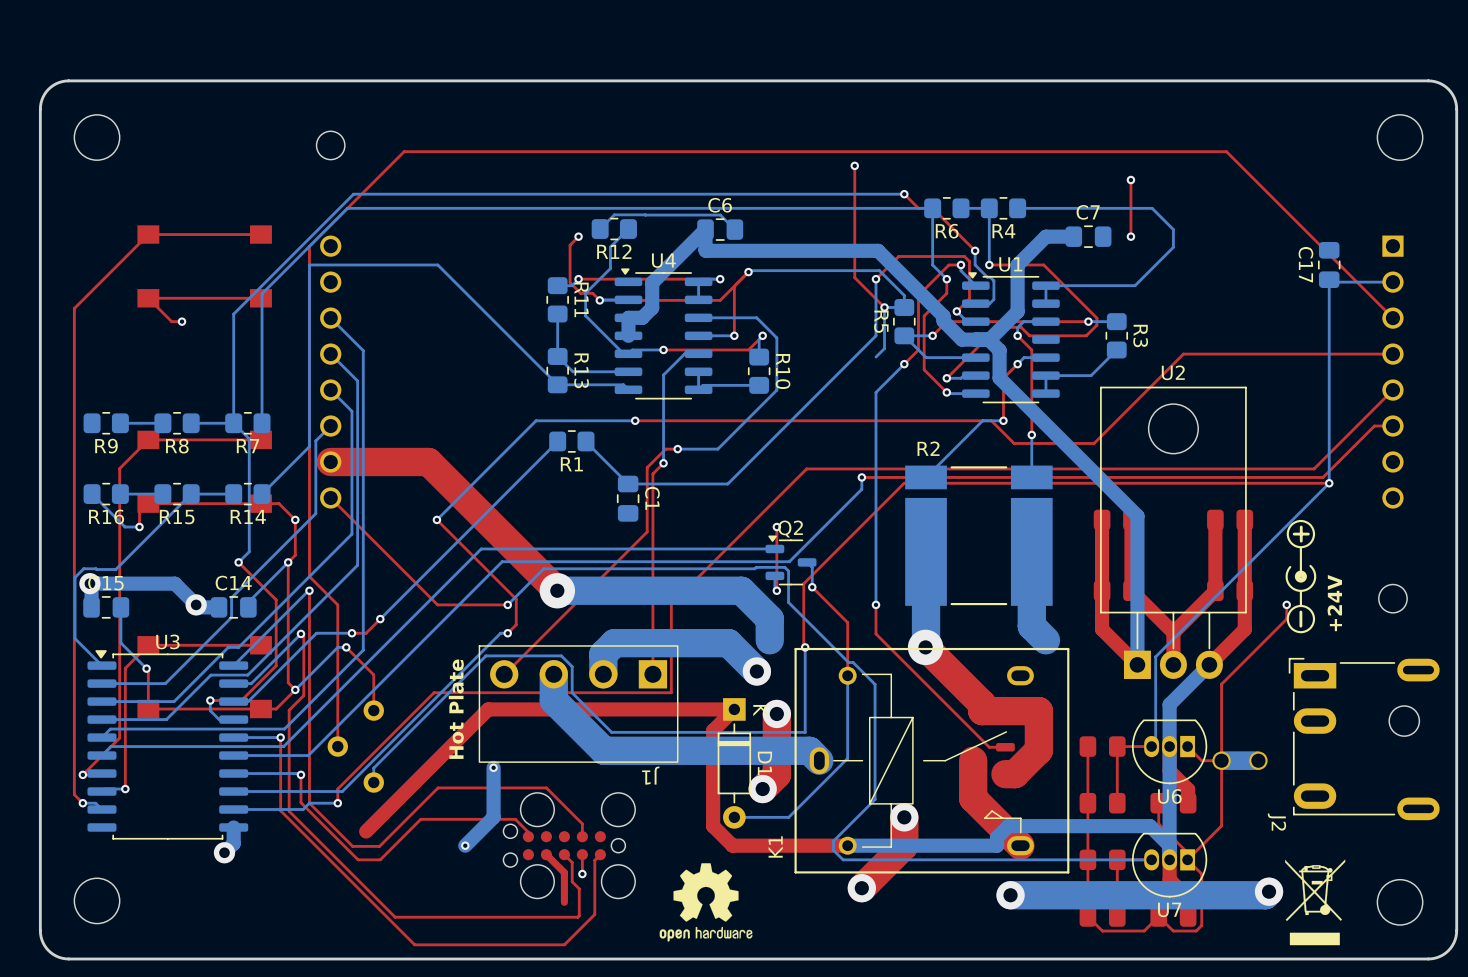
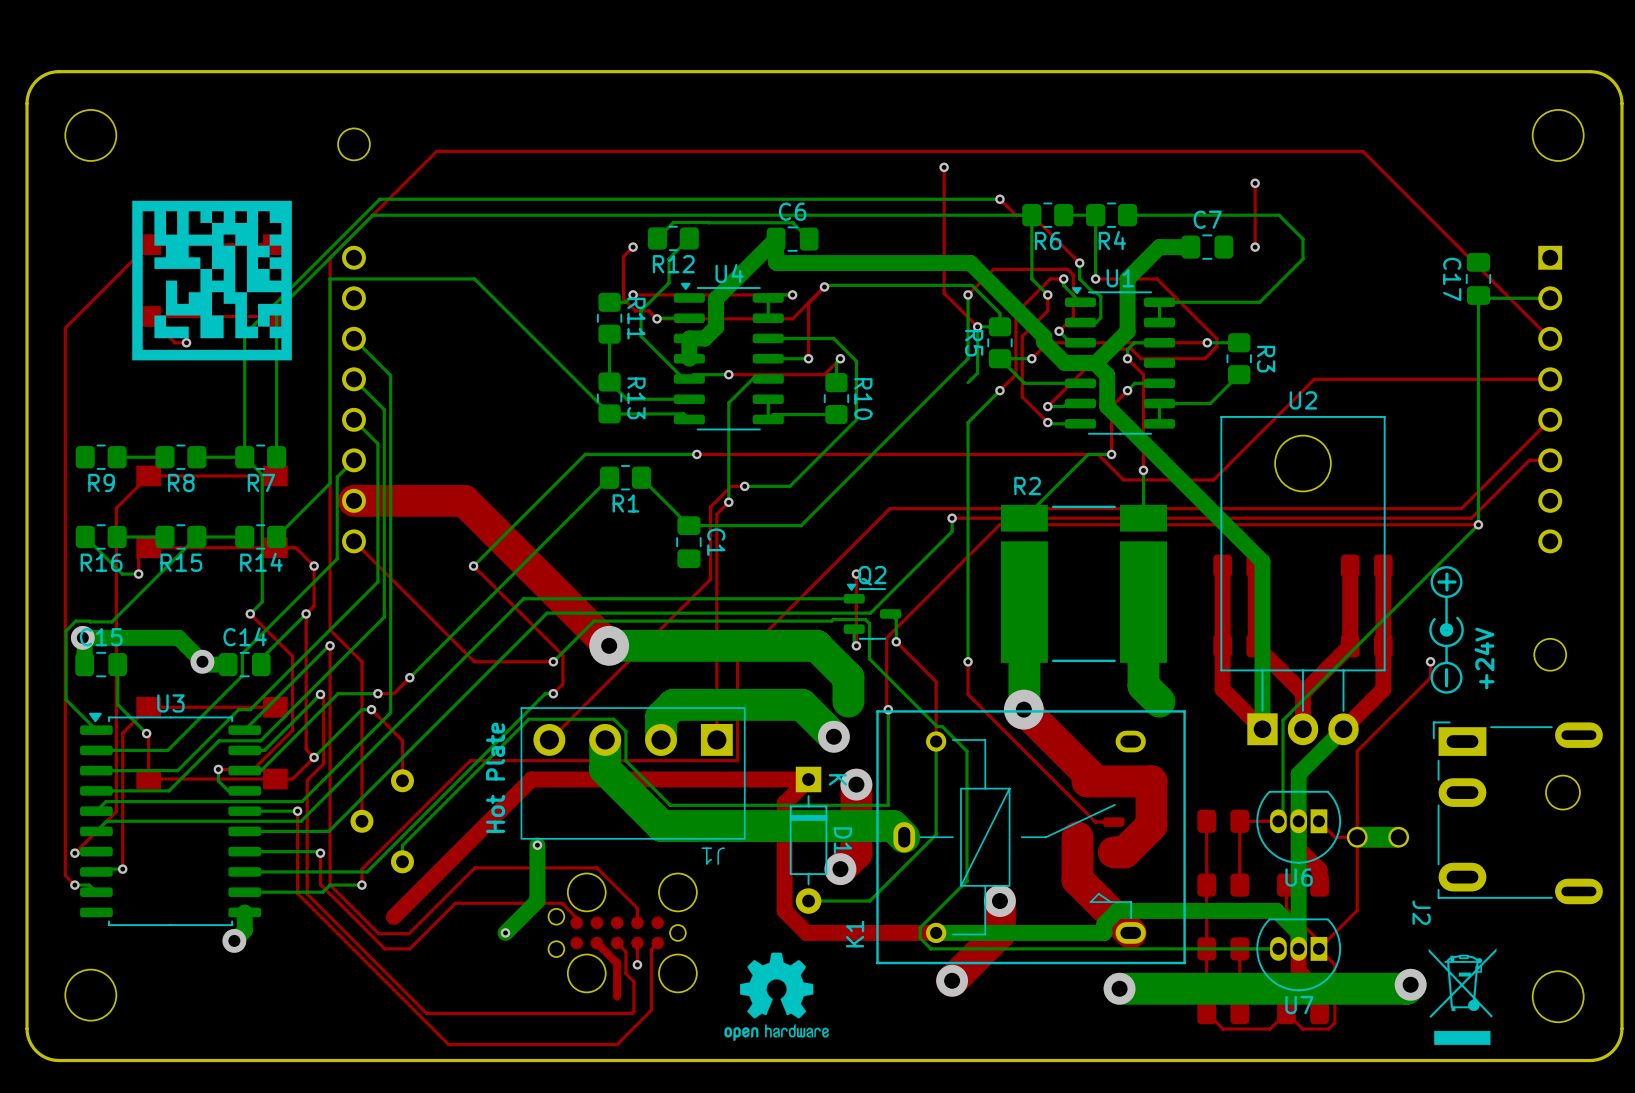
drawing: none -> [132, 200, 292, 361]

